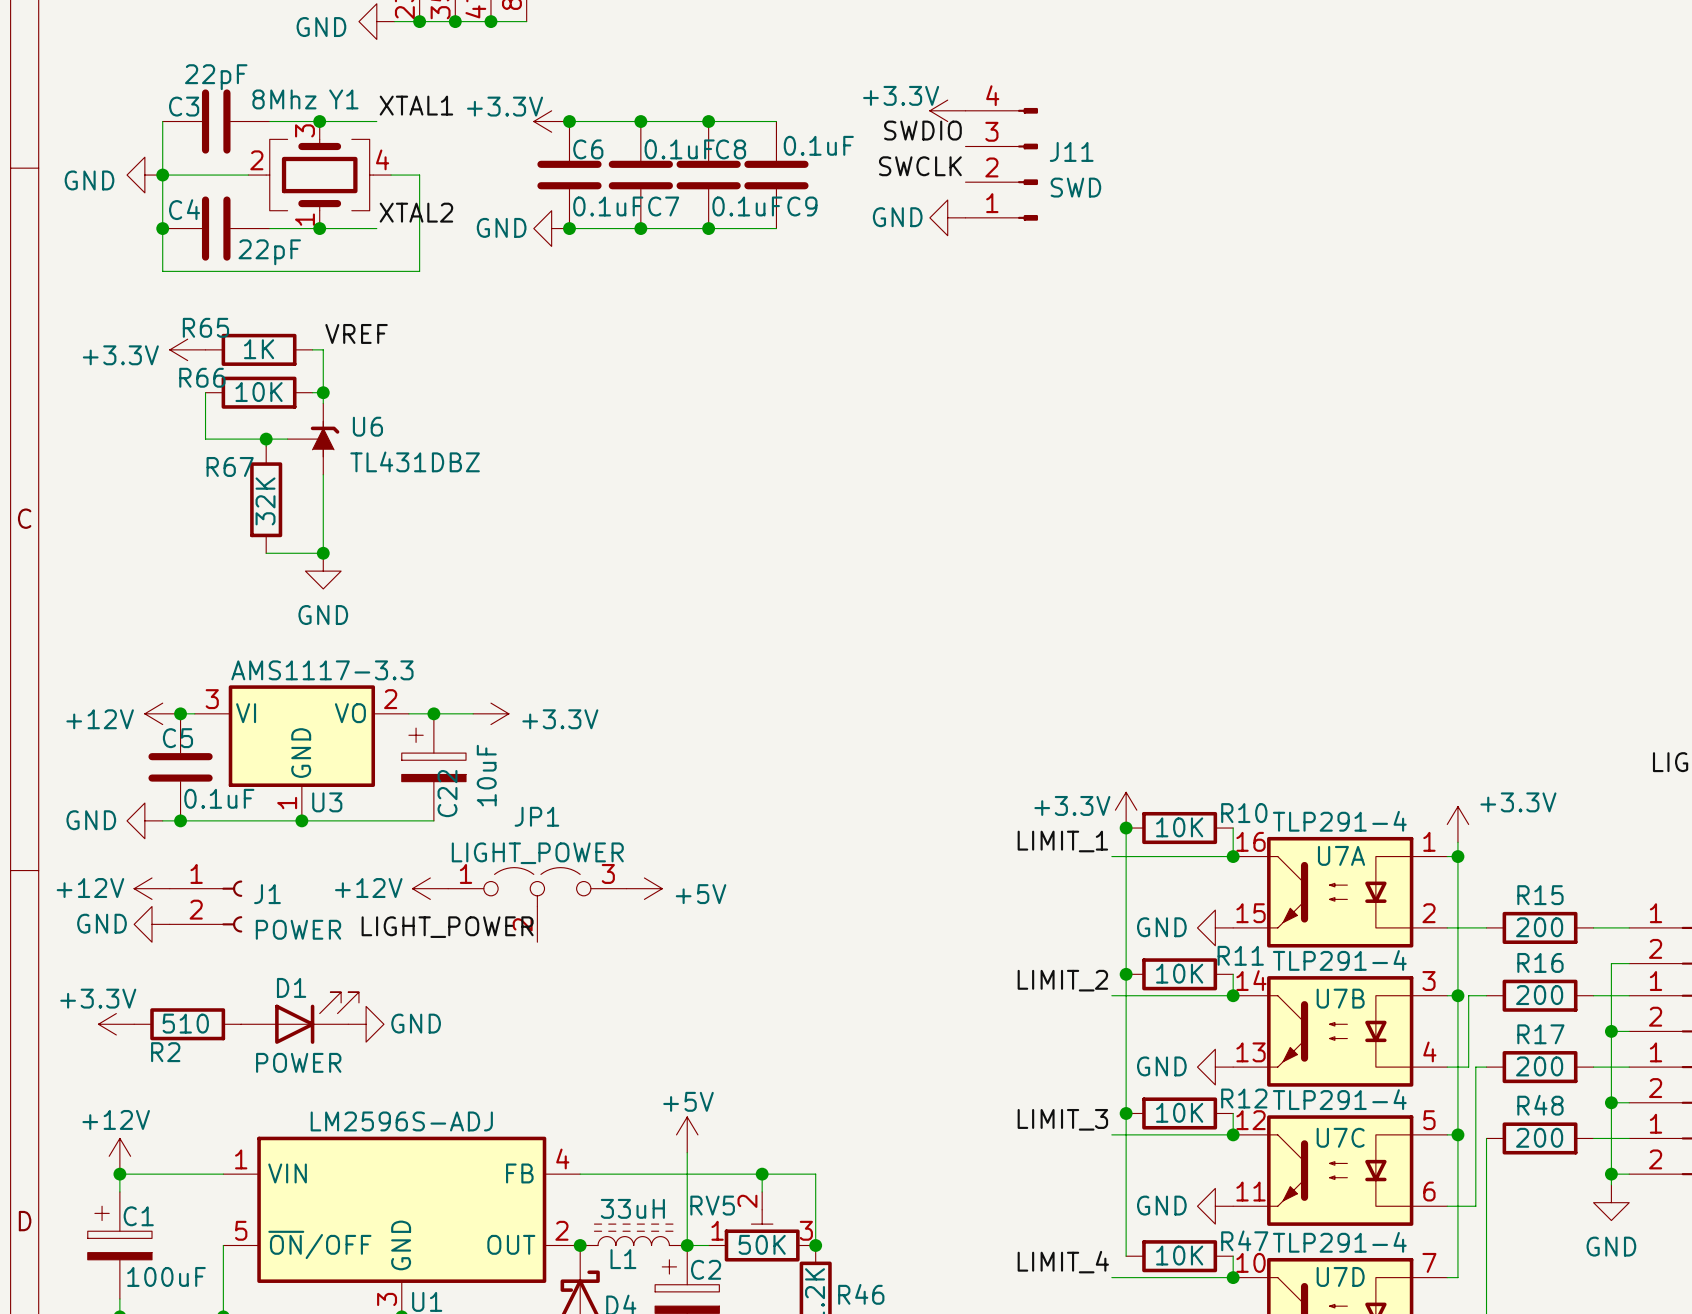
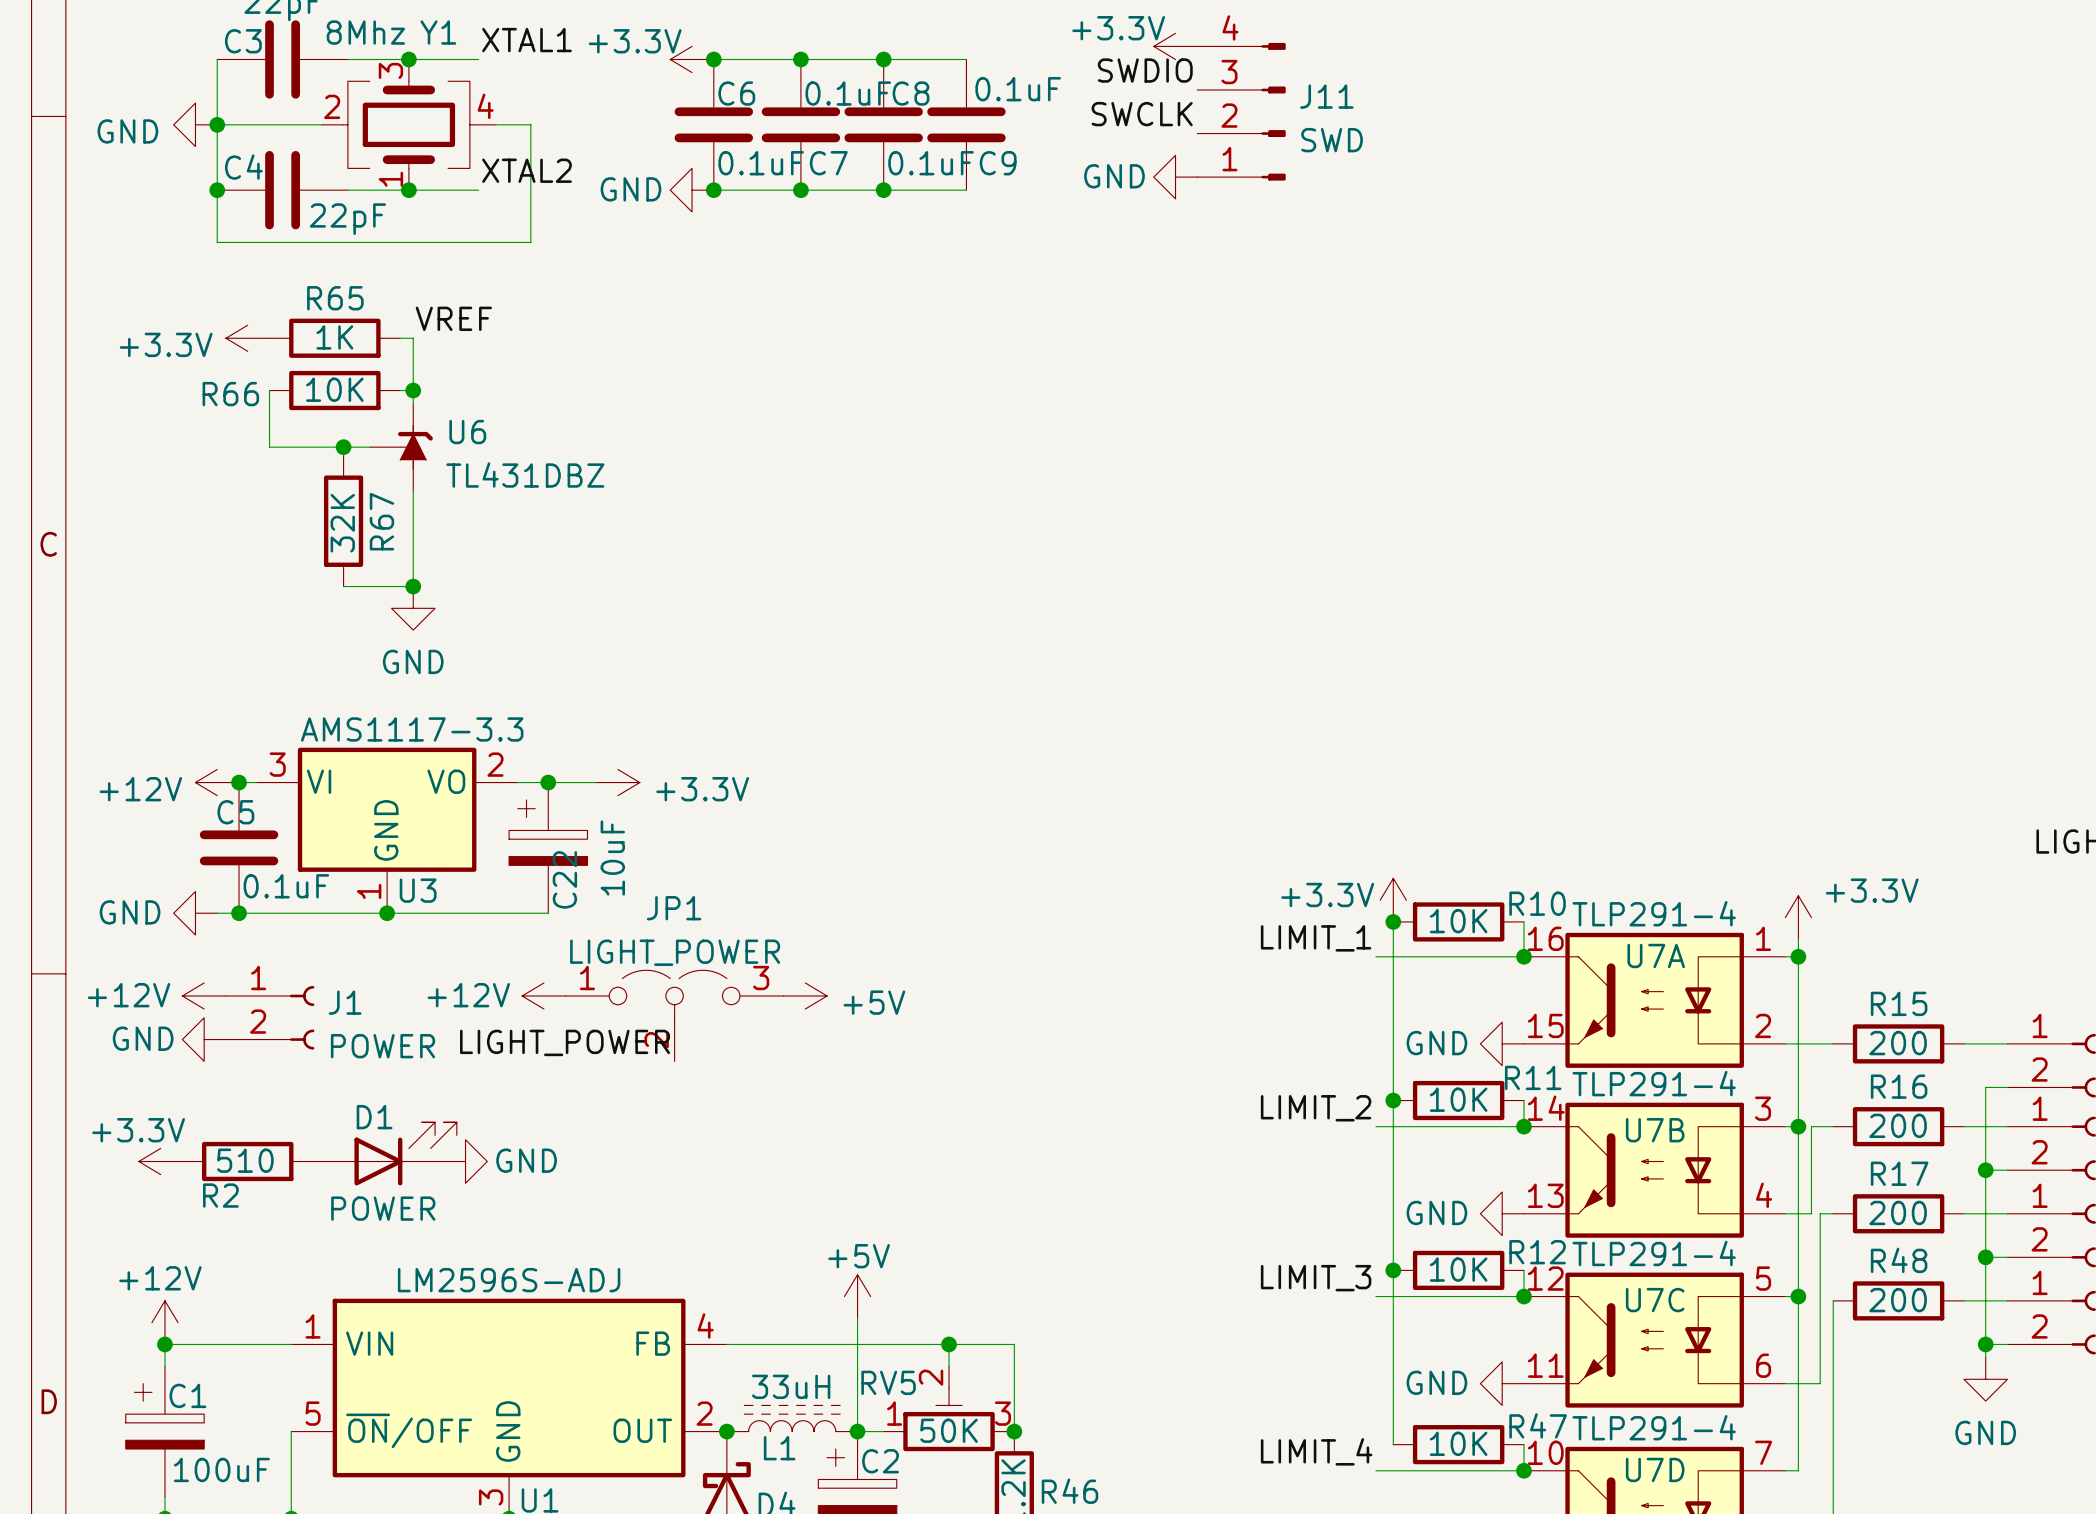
R65 name position: R65 (205, 327) -> R65 (335, 298)
R66 name position: R66 (202, 377) -> R66 (230, 394)
R67 name rotation: 0° (230, 466) -> 90° counterclockwise (381, 521)
R67 name position: R67 (230, 466) -> R67 (381, 521)

